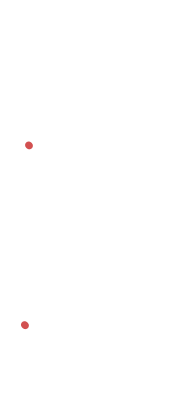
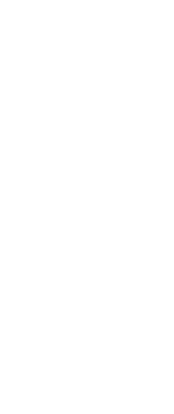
track: (28, 145) (29, 145) -> none
track: (24, 324) (25, 325) -> none

